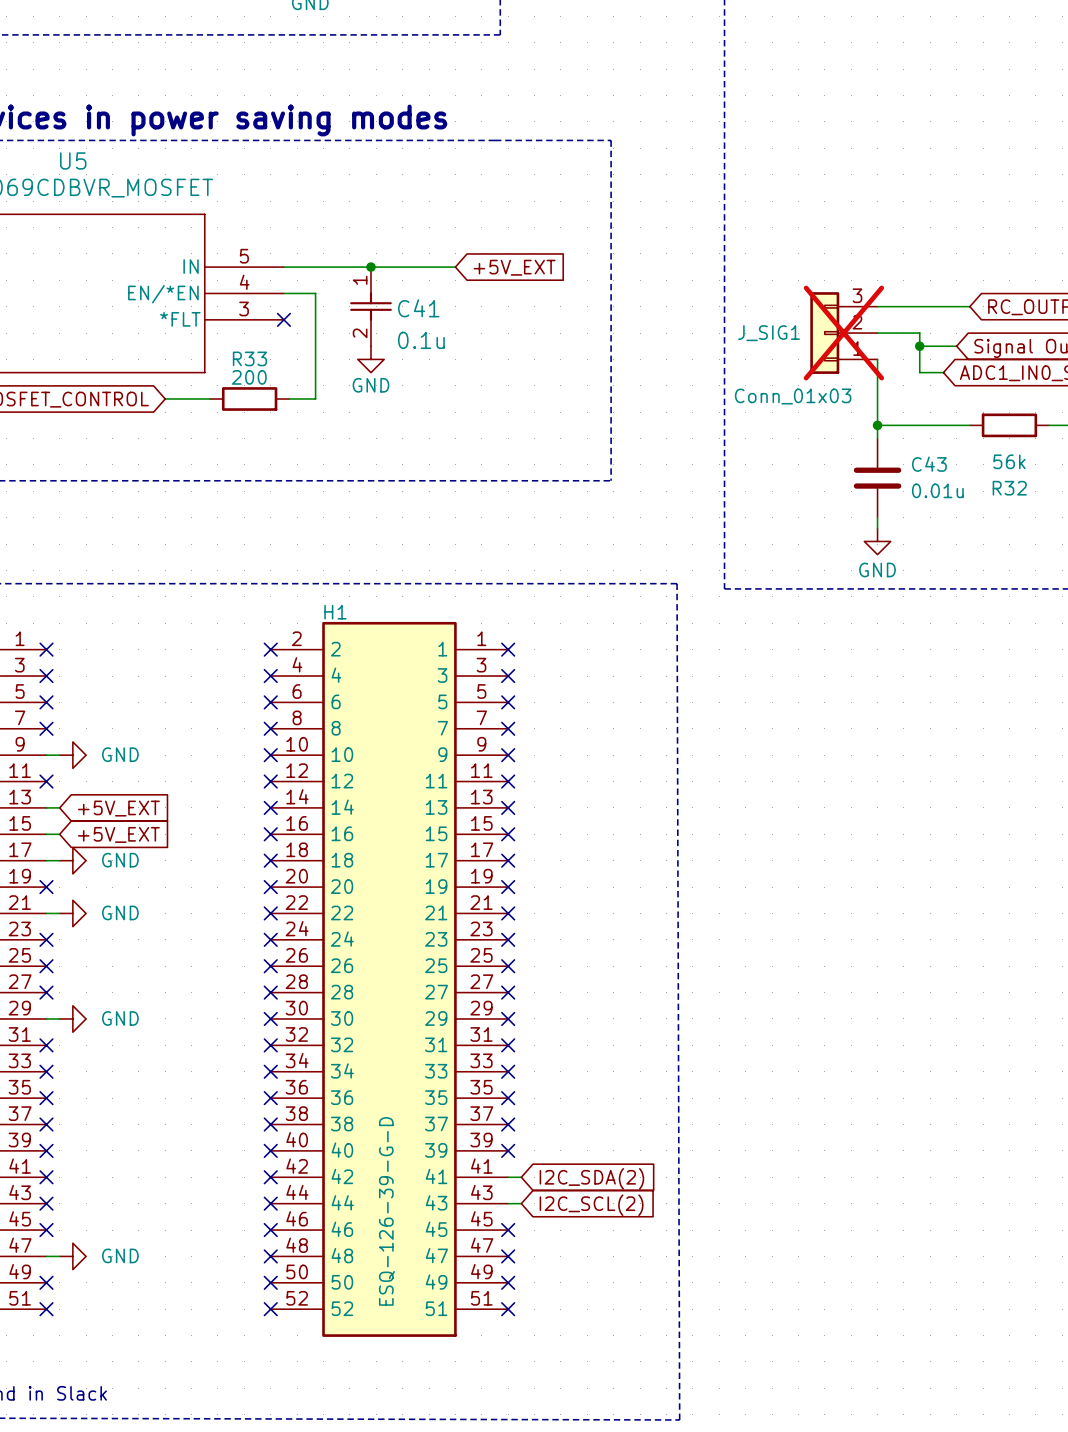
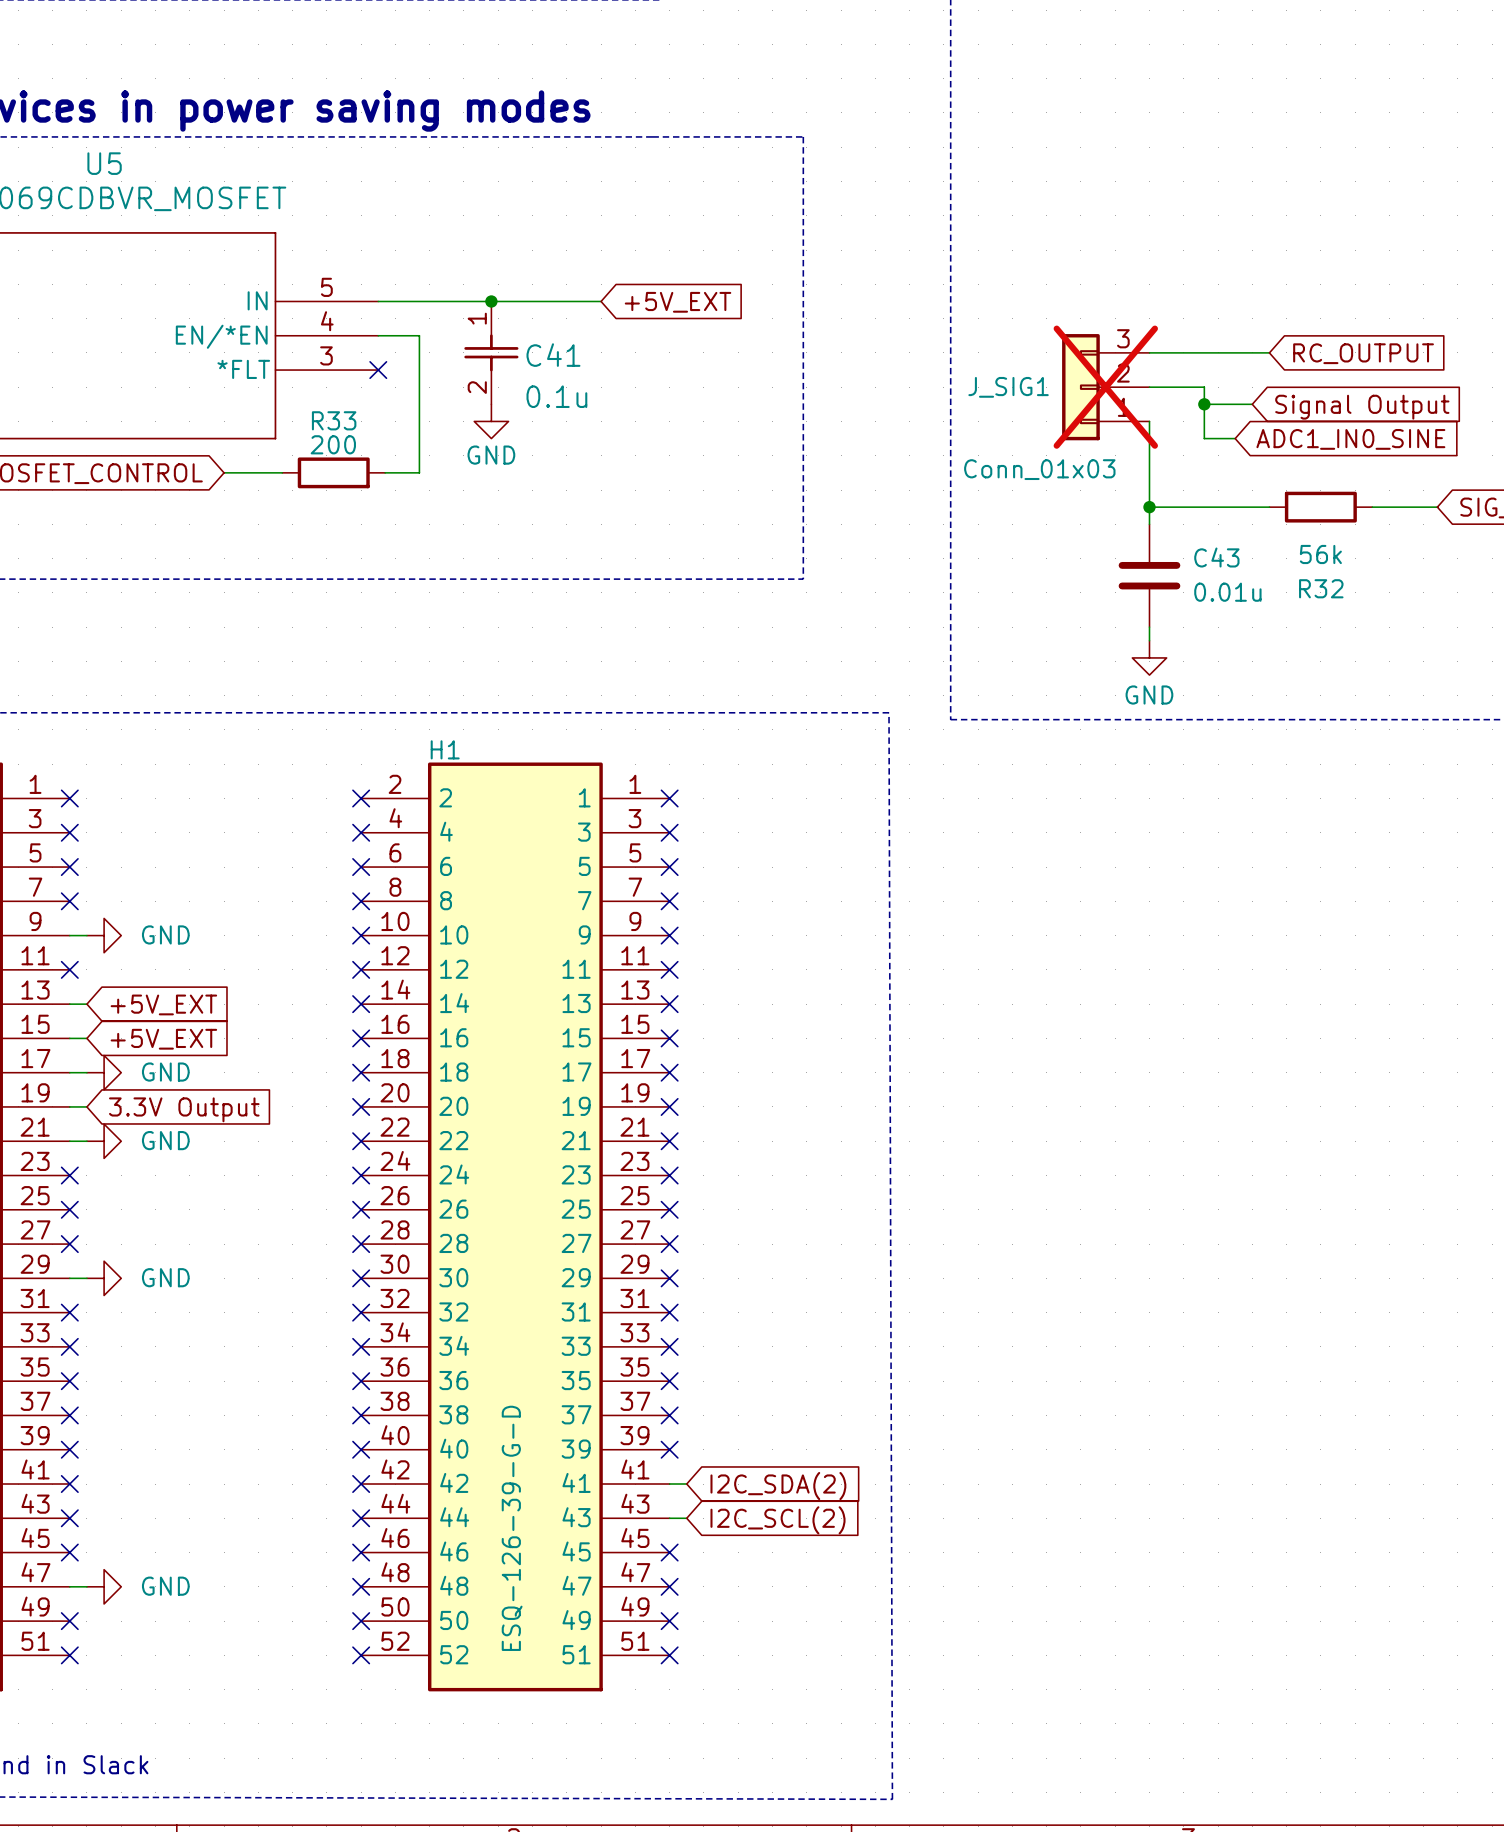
wire: none -> (69, 1106) (86, 1106)
no-connect mark: (46, 887) -> none
global label: none -> 3.3V Output (184, 1109)

